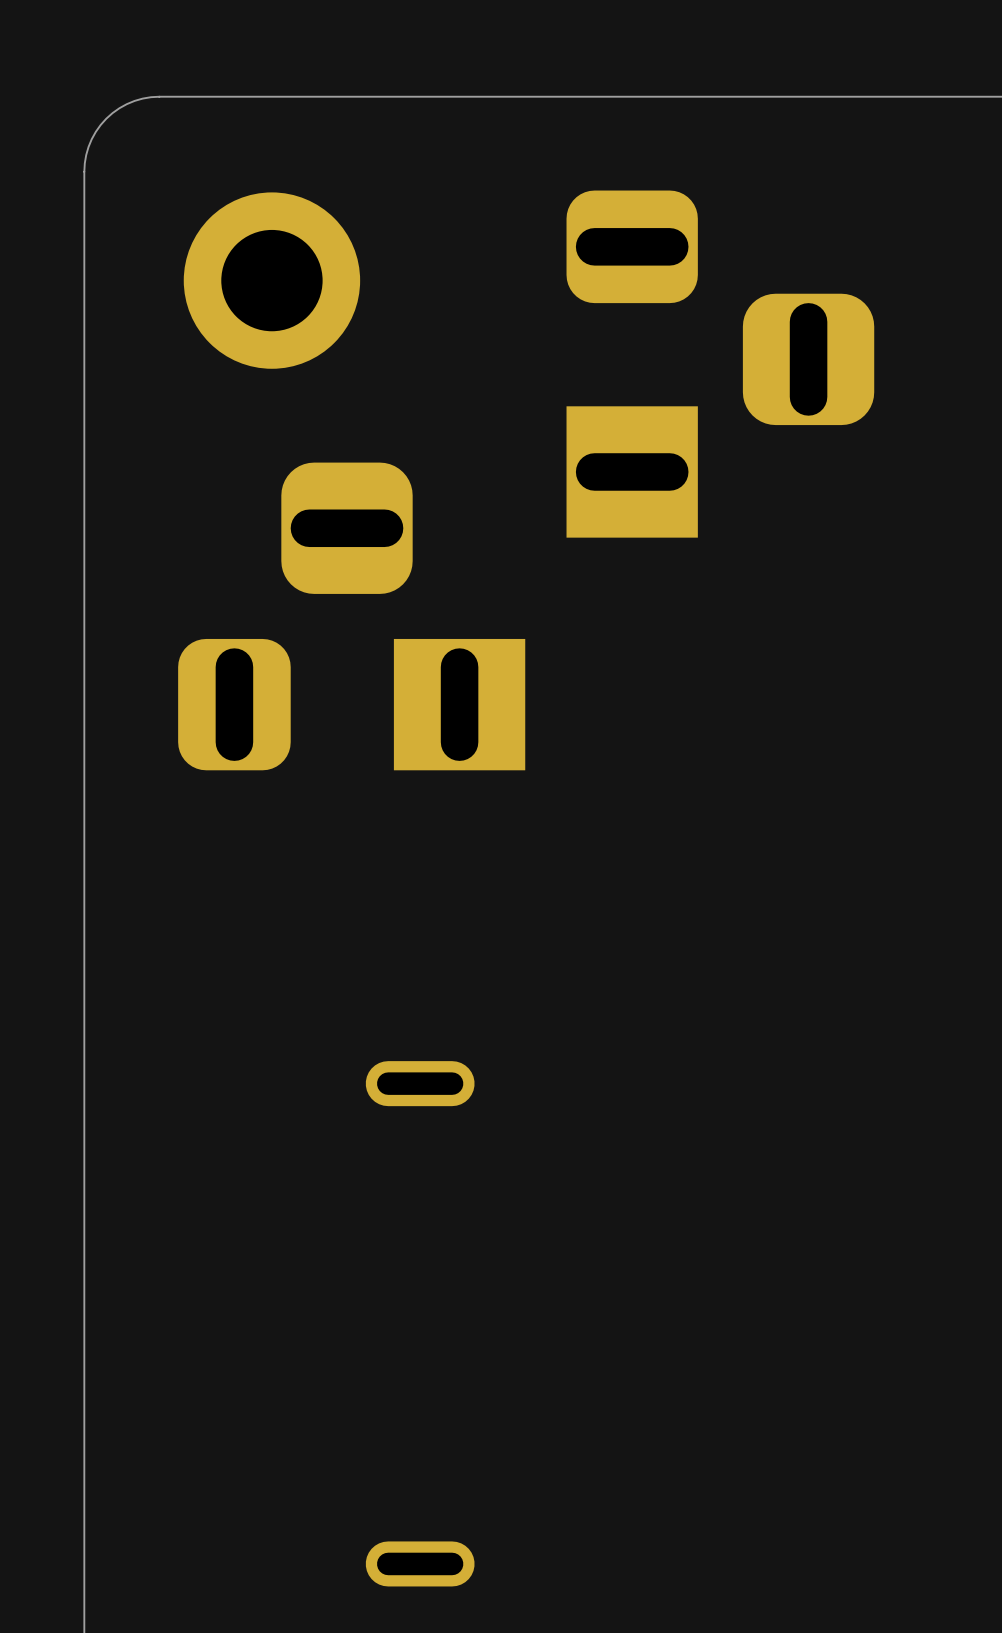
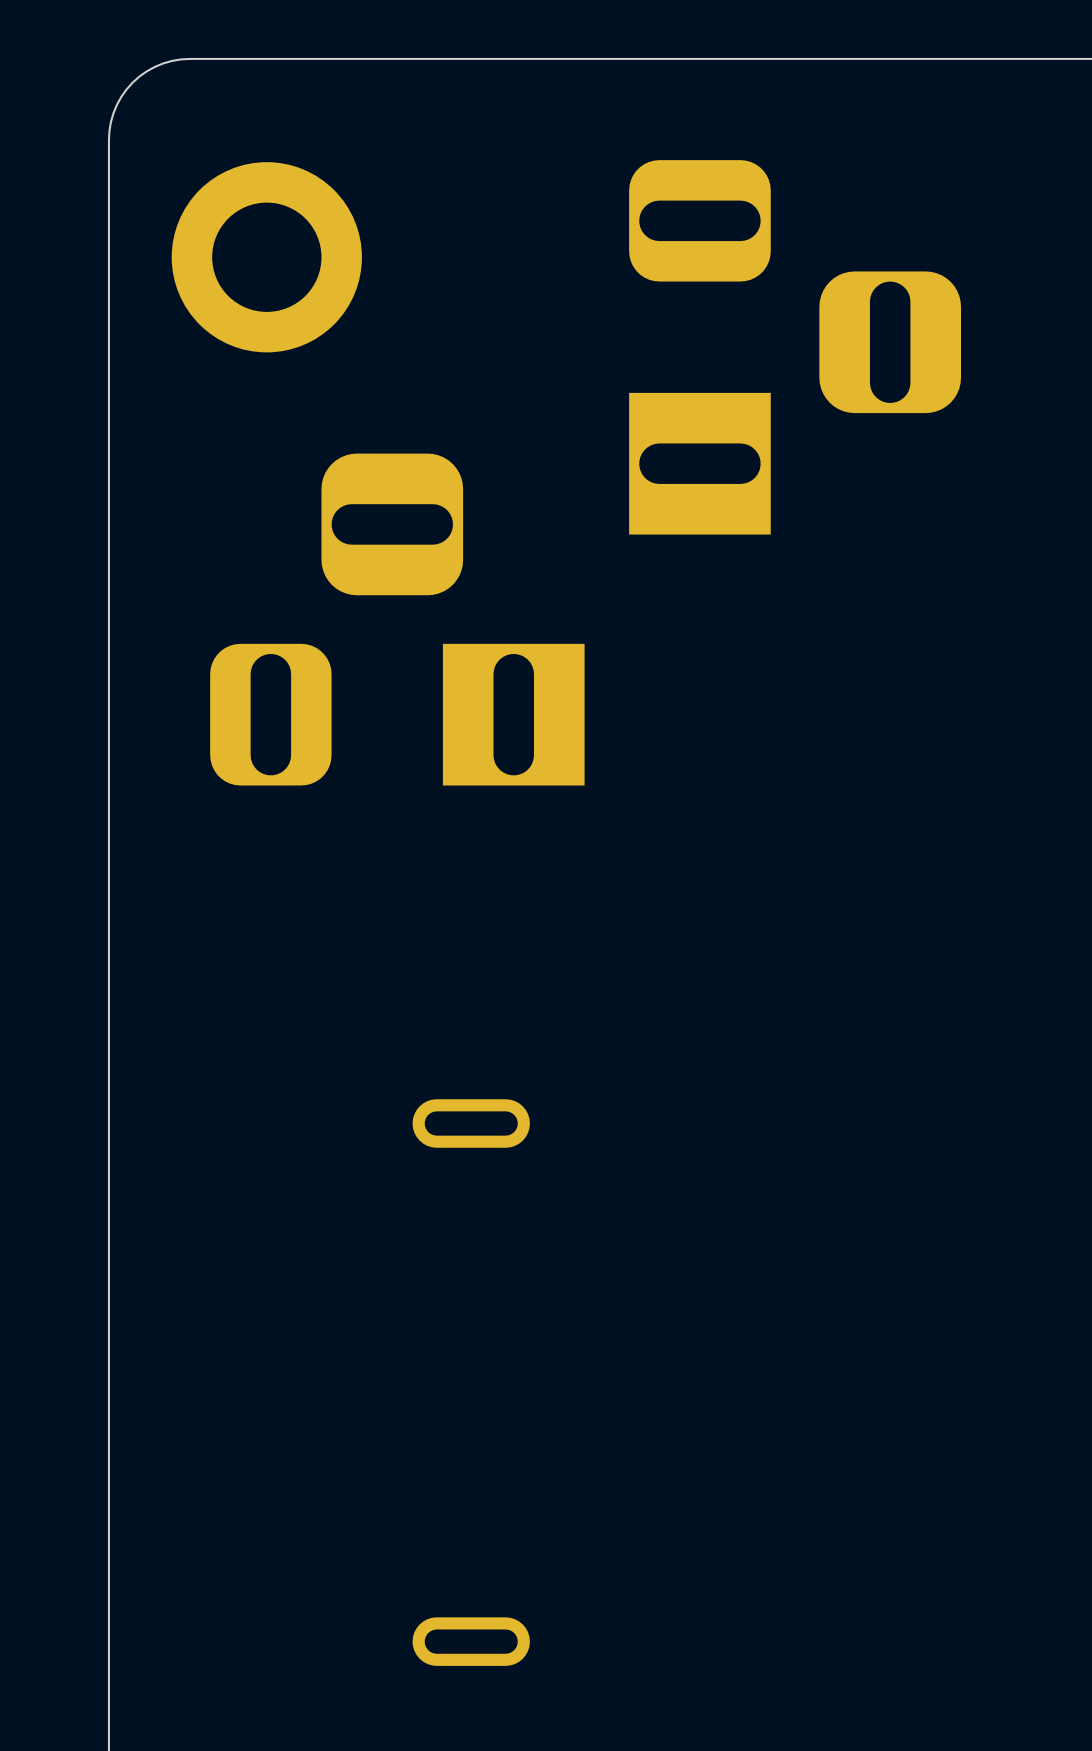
part position: (271, 280) -> (266, 257)

